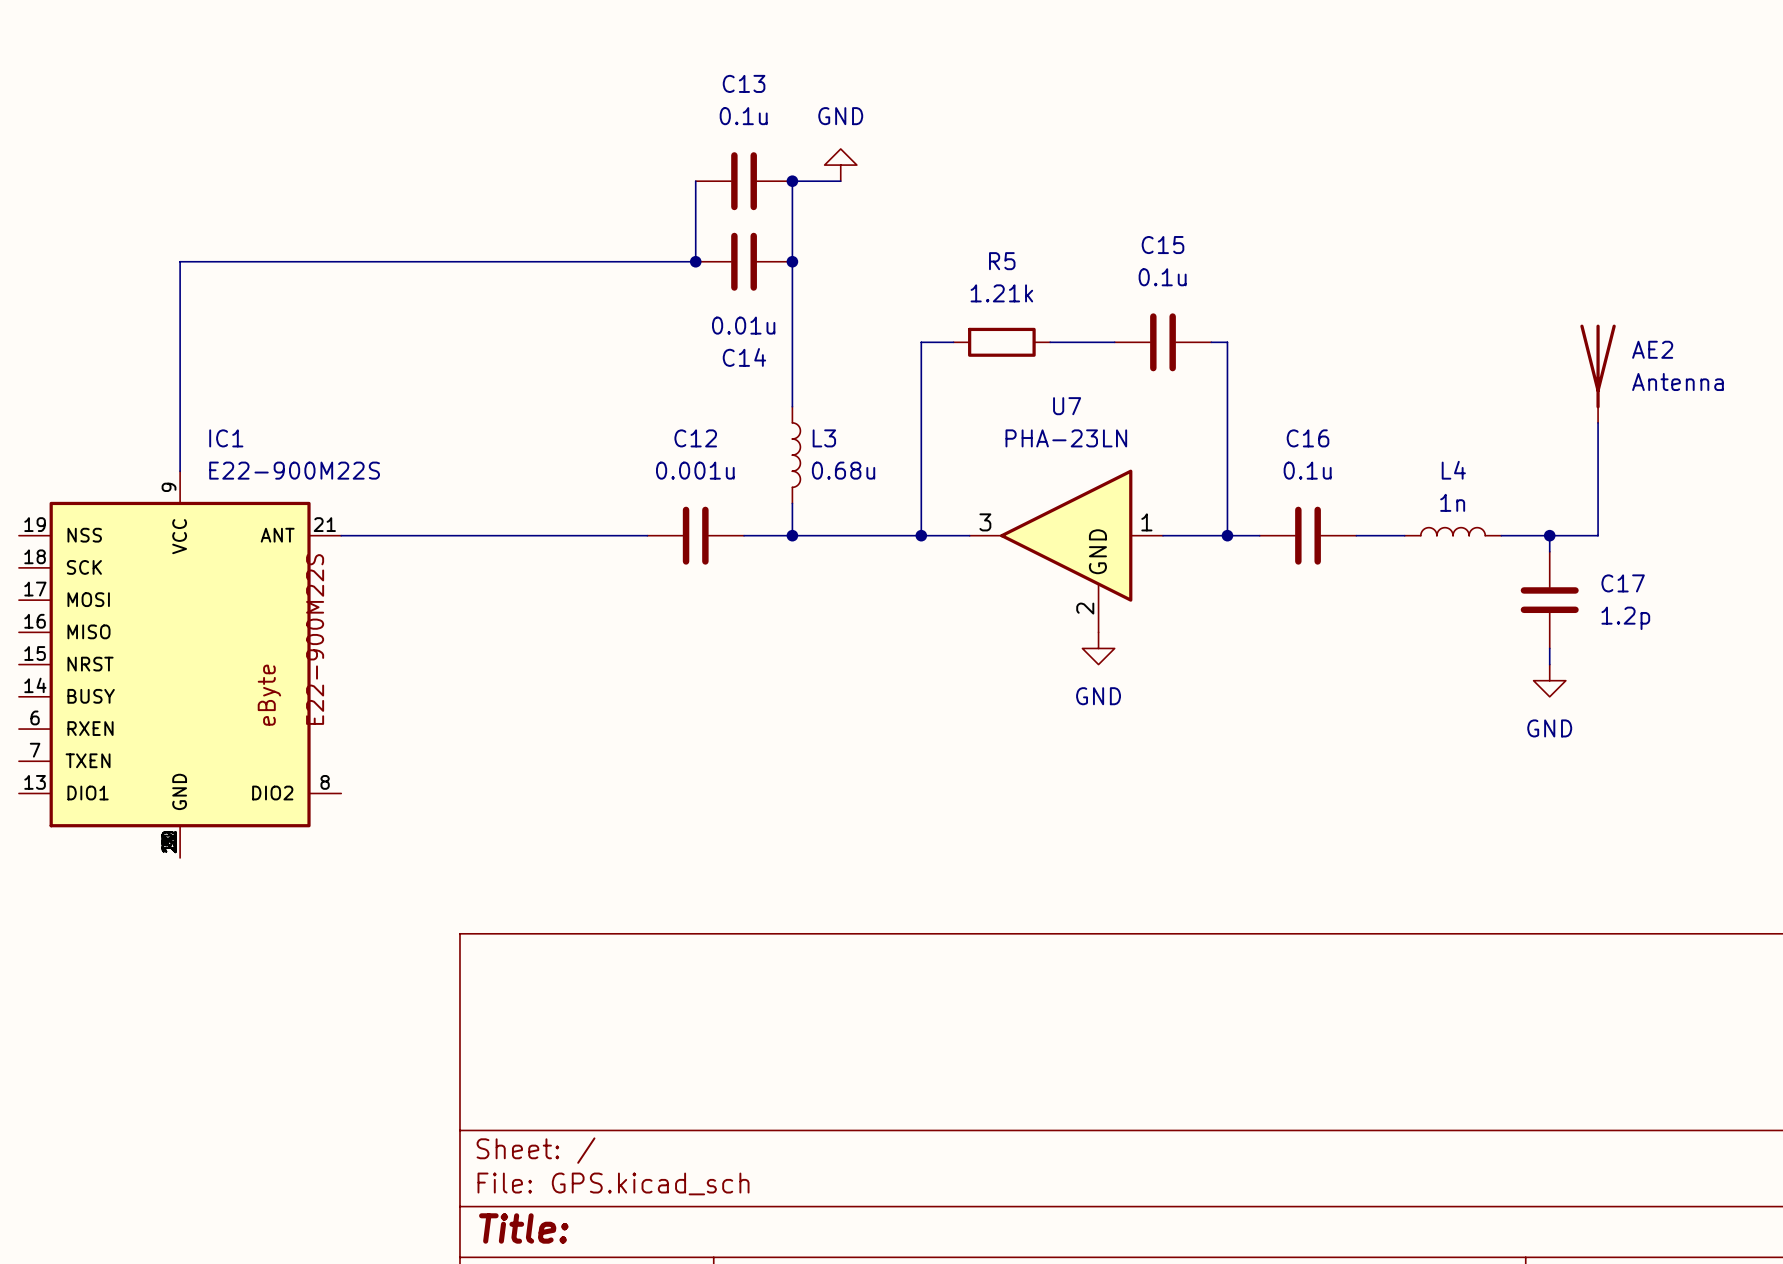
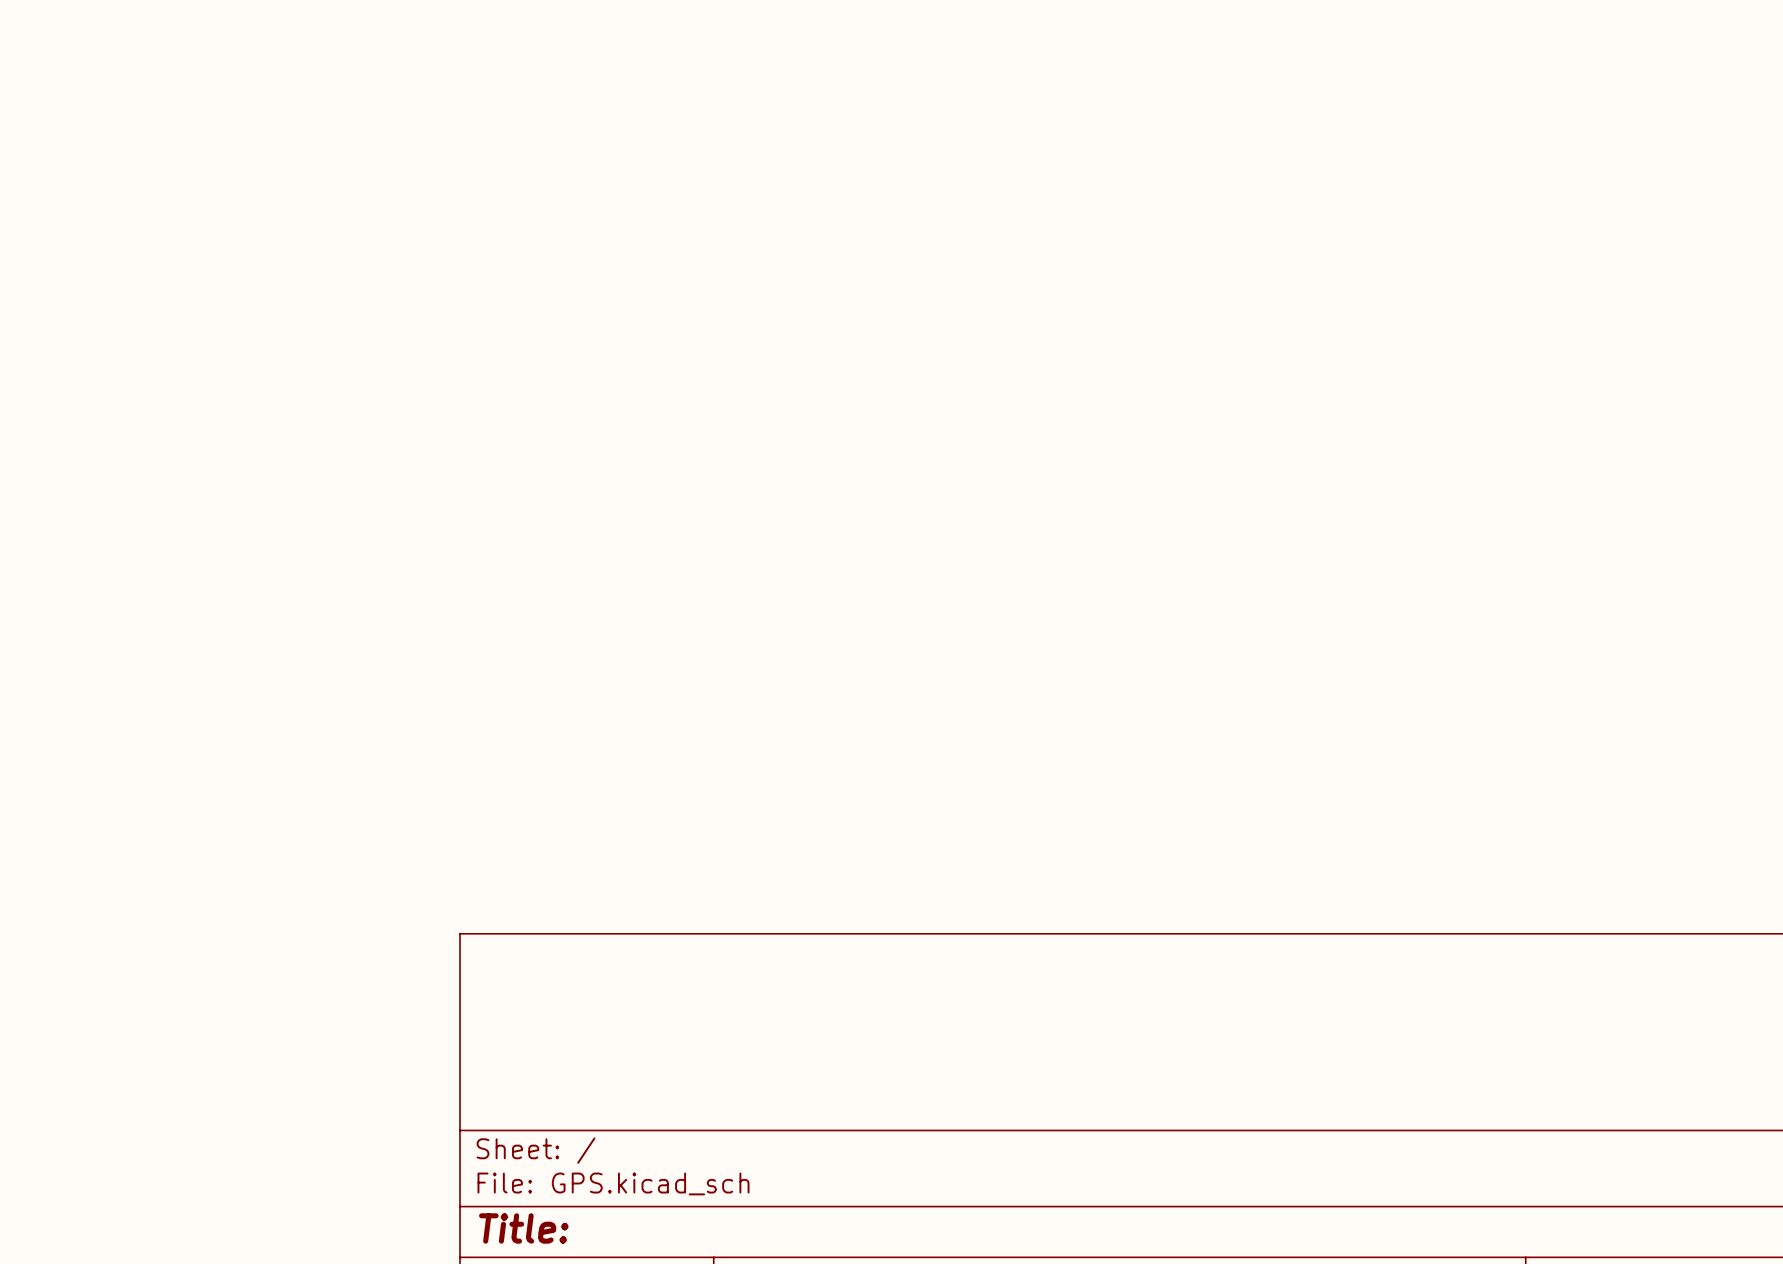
power symbol: GND (840, 165) -> none
wire: (695, 181) (695, 261) (180, 261) (180, 471) -> none
C13: 0.1u (744, 181) -> none
junction: (792, 181) -> none
wire: (840, 181) (792, 181) (792, 406) -> none
junction: (695, 261) -> none
C14: 0.01u (744, 261) -> none
junction: (792, 261) -> none
wire: (953, 342) (921, 342) (921, 535) -> none
R5: 1.21k (1001, 342) -> none
wire: (1050, 342) (1114, 342) -> none
C15: 0.1u (1163, 342) -> none
wire: (1211, 342) (1227, 342) (1227, 535) -> none
AE2: Antenna (1598, 373) -> none
wire: (1598, 422) (1598, 535) (1501, 535) -> none
L3: 0.68u (796, 455) -> none
wire: (792, 503) (792, 535) -> none
L4: 1n (1453, 531) -> none
wire: (341, 535) (647, 535) -> none
C12: 0.001u (695, 535) -> none
wire: (744, 535) (969, 535) -> none
junction: (792, 535) -> none
junction: (921, 535) -> none
wire: (1163, 535) (1259, 535) -> none
junction: (1227, 535) -> none
C16: 0.1u (1308, 535) -> none
wire: (1356, 535) (1404, 535) -> none
wire: (1549, 535) (1549, 551) -> none
junction: (1549, 535) -> none
U7: PHA-23LN (1066, 550) -> none
C17: 1.2p (1549, 600) -> none
power symbol: GND (1098, 648) -> none
wire: (1549, 648) (1549, 664) -> none
IC1: E22-900M22S (180, 664) -> none
power symbol: GND (1549, 680) -> none

